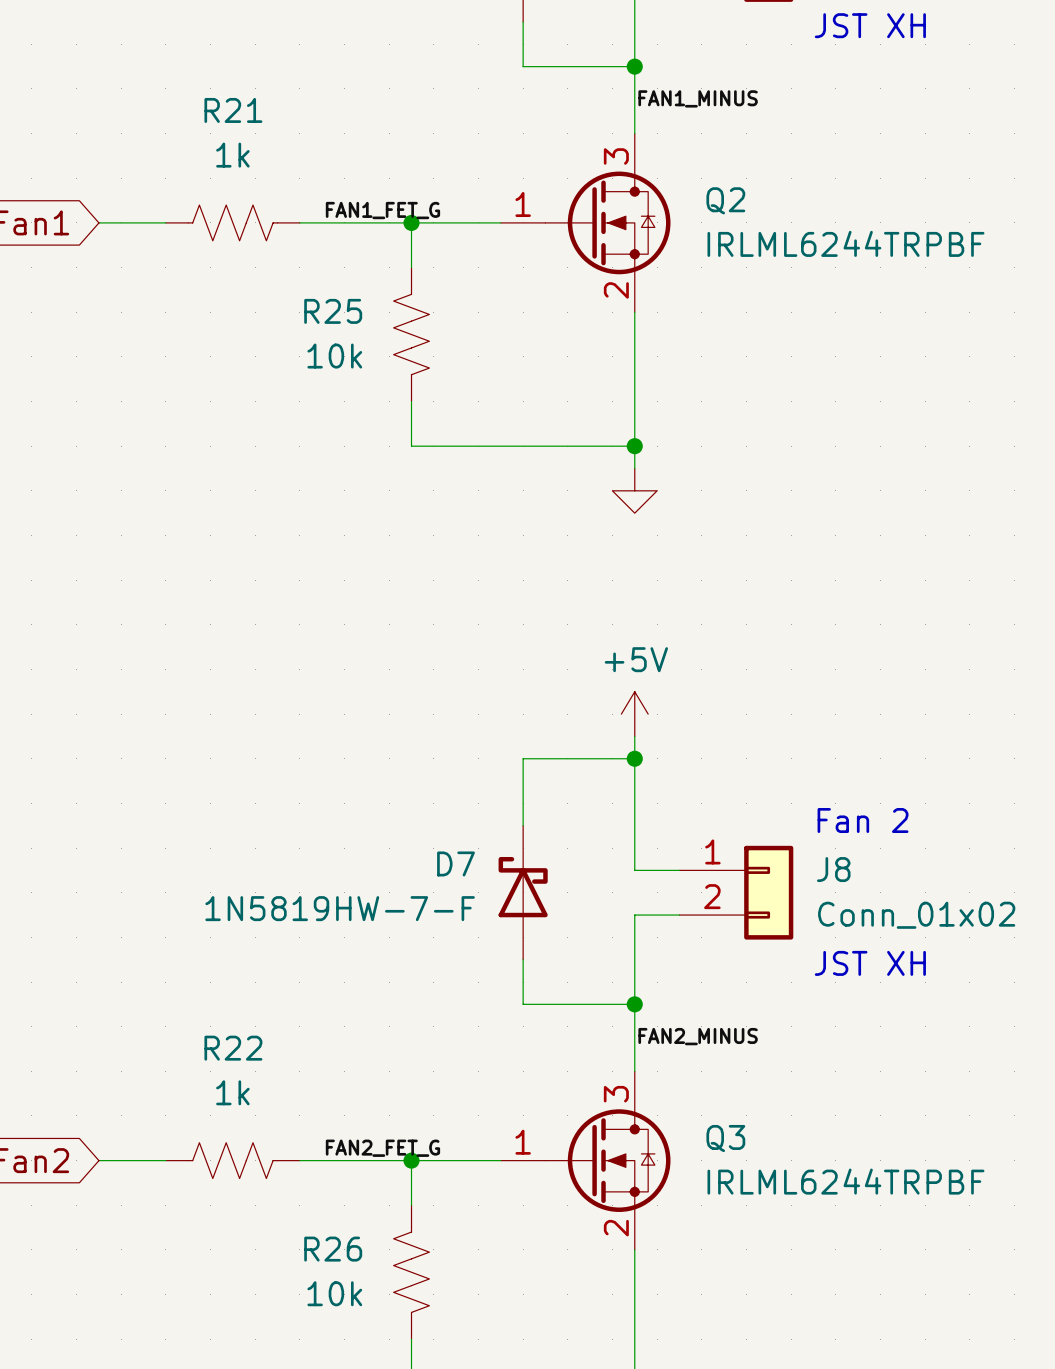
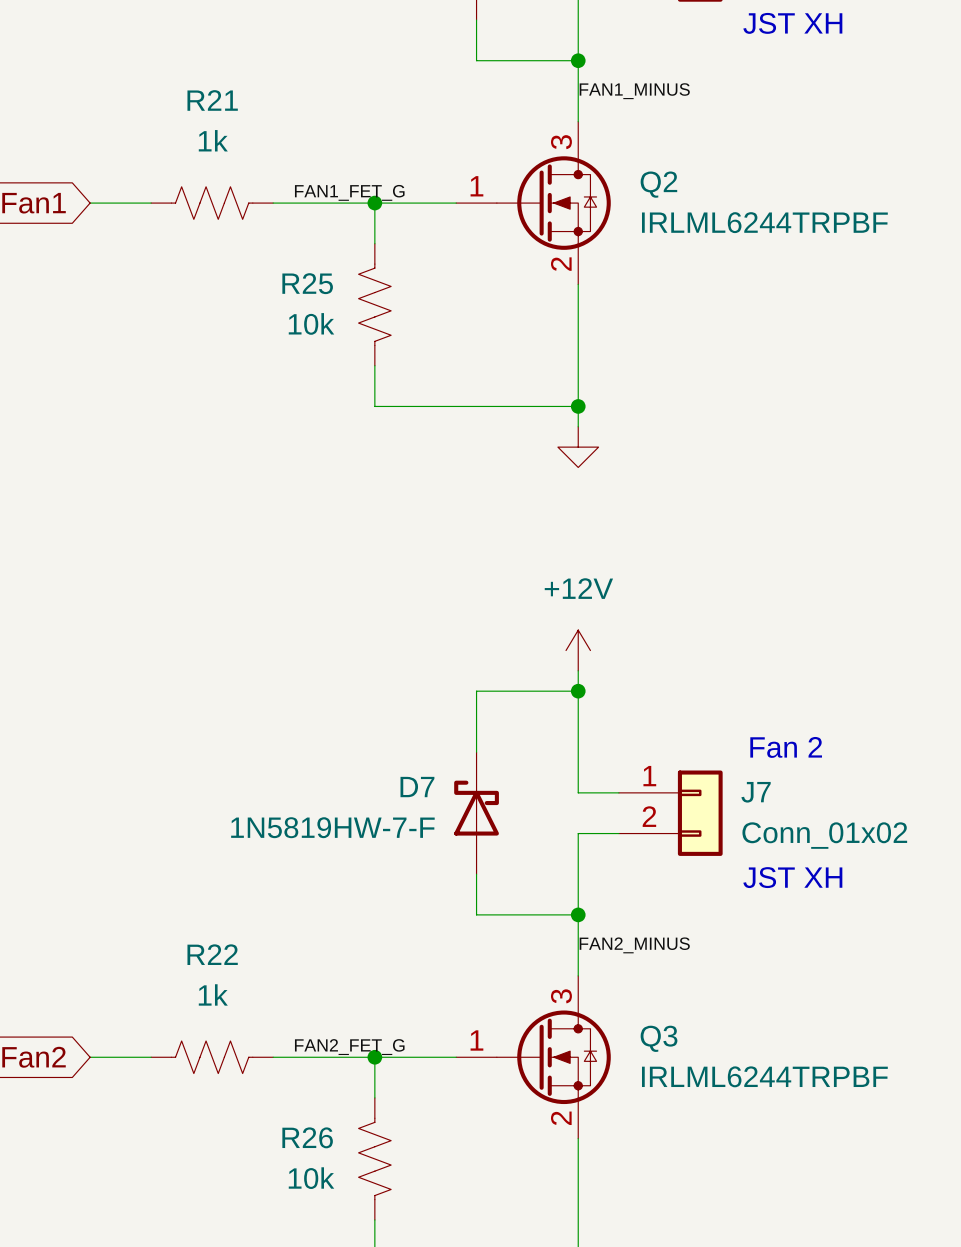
power symbol: +5V (634, 714) -> +12V (578, 650)
J8 name: J8 (833, 869) -> J7 (756, 792)

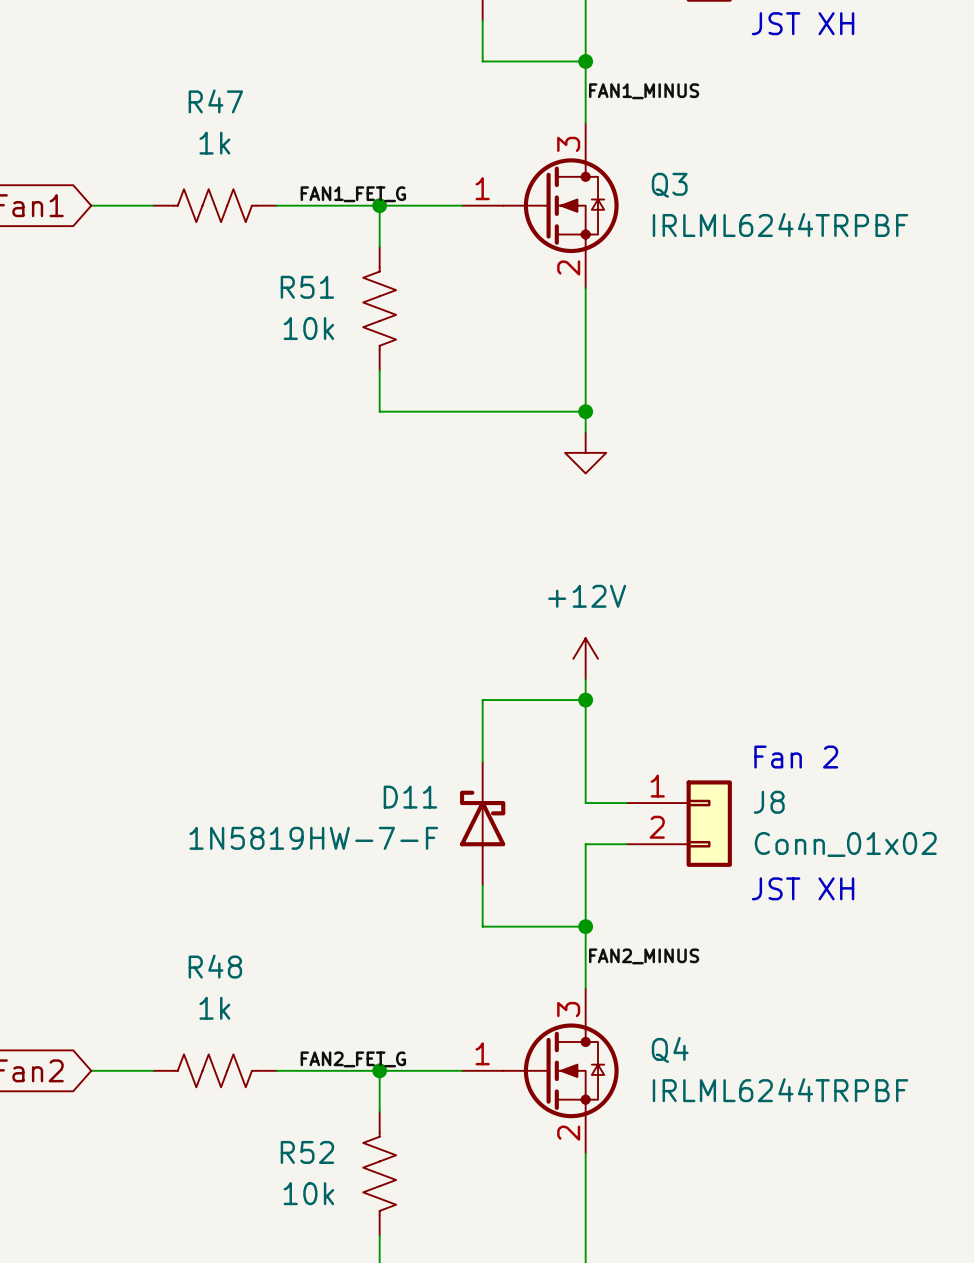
R21 name: R21 (212, 100) -> R47 (215, 101)
Q2 name: Q2 (658, 184) -> Q3 (669, 185)
R25 name: R25 (307, 283) -> R51 (307, 287)
D7 name: D7 (417, 787) -> D11 (410, 797)
J7 name: J7 (756, 792) -> J8 (769, 802)
R22 name: R22 (212, 954) -> R48 (215, 966)
Q3 name: Q3 (659, 1038) -> Q4 (670, 1049)
R26 name: R26 (307, 1137) -> R52 (307, 1152)

